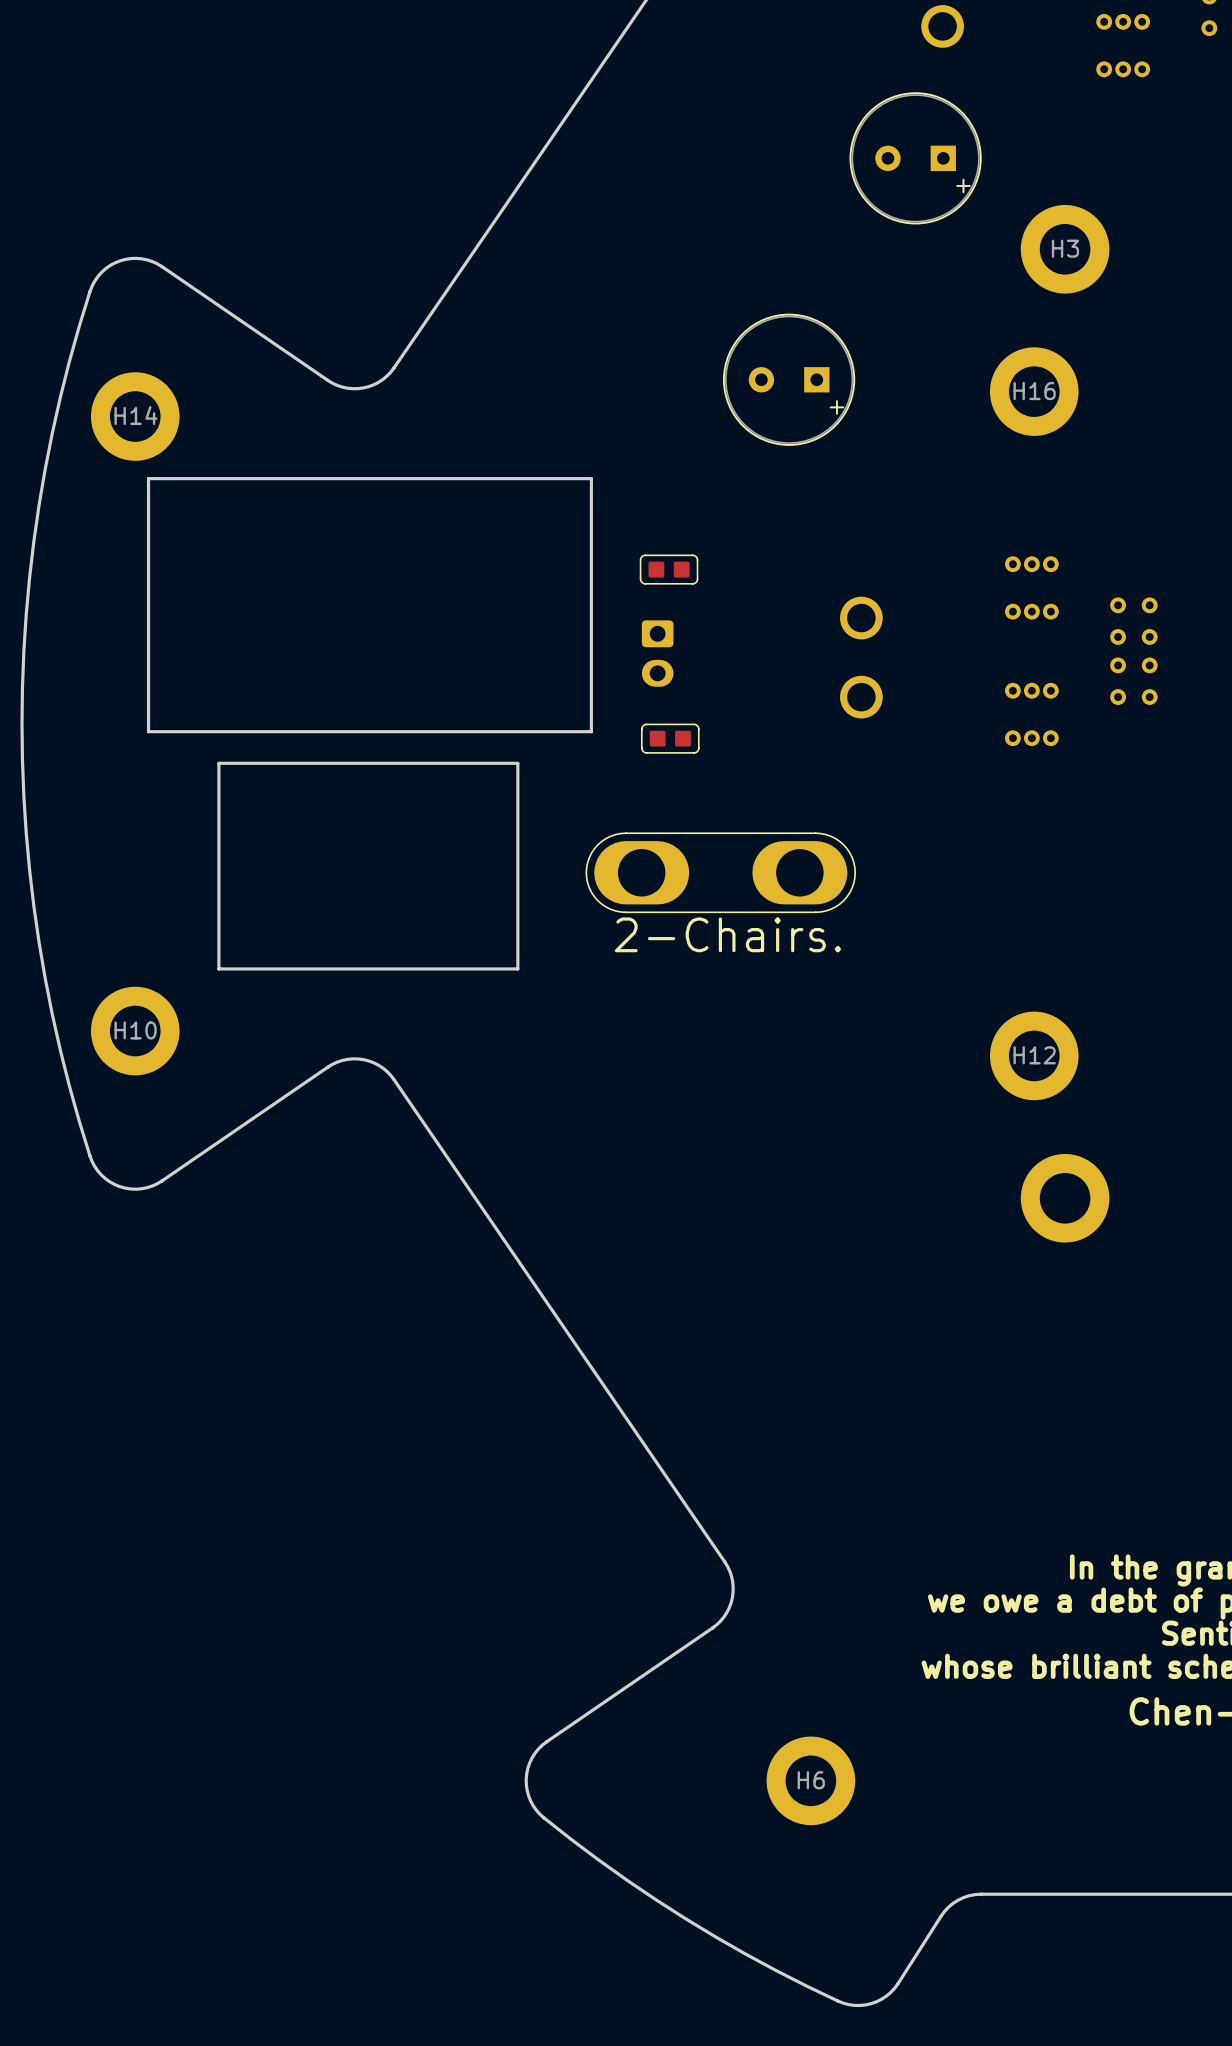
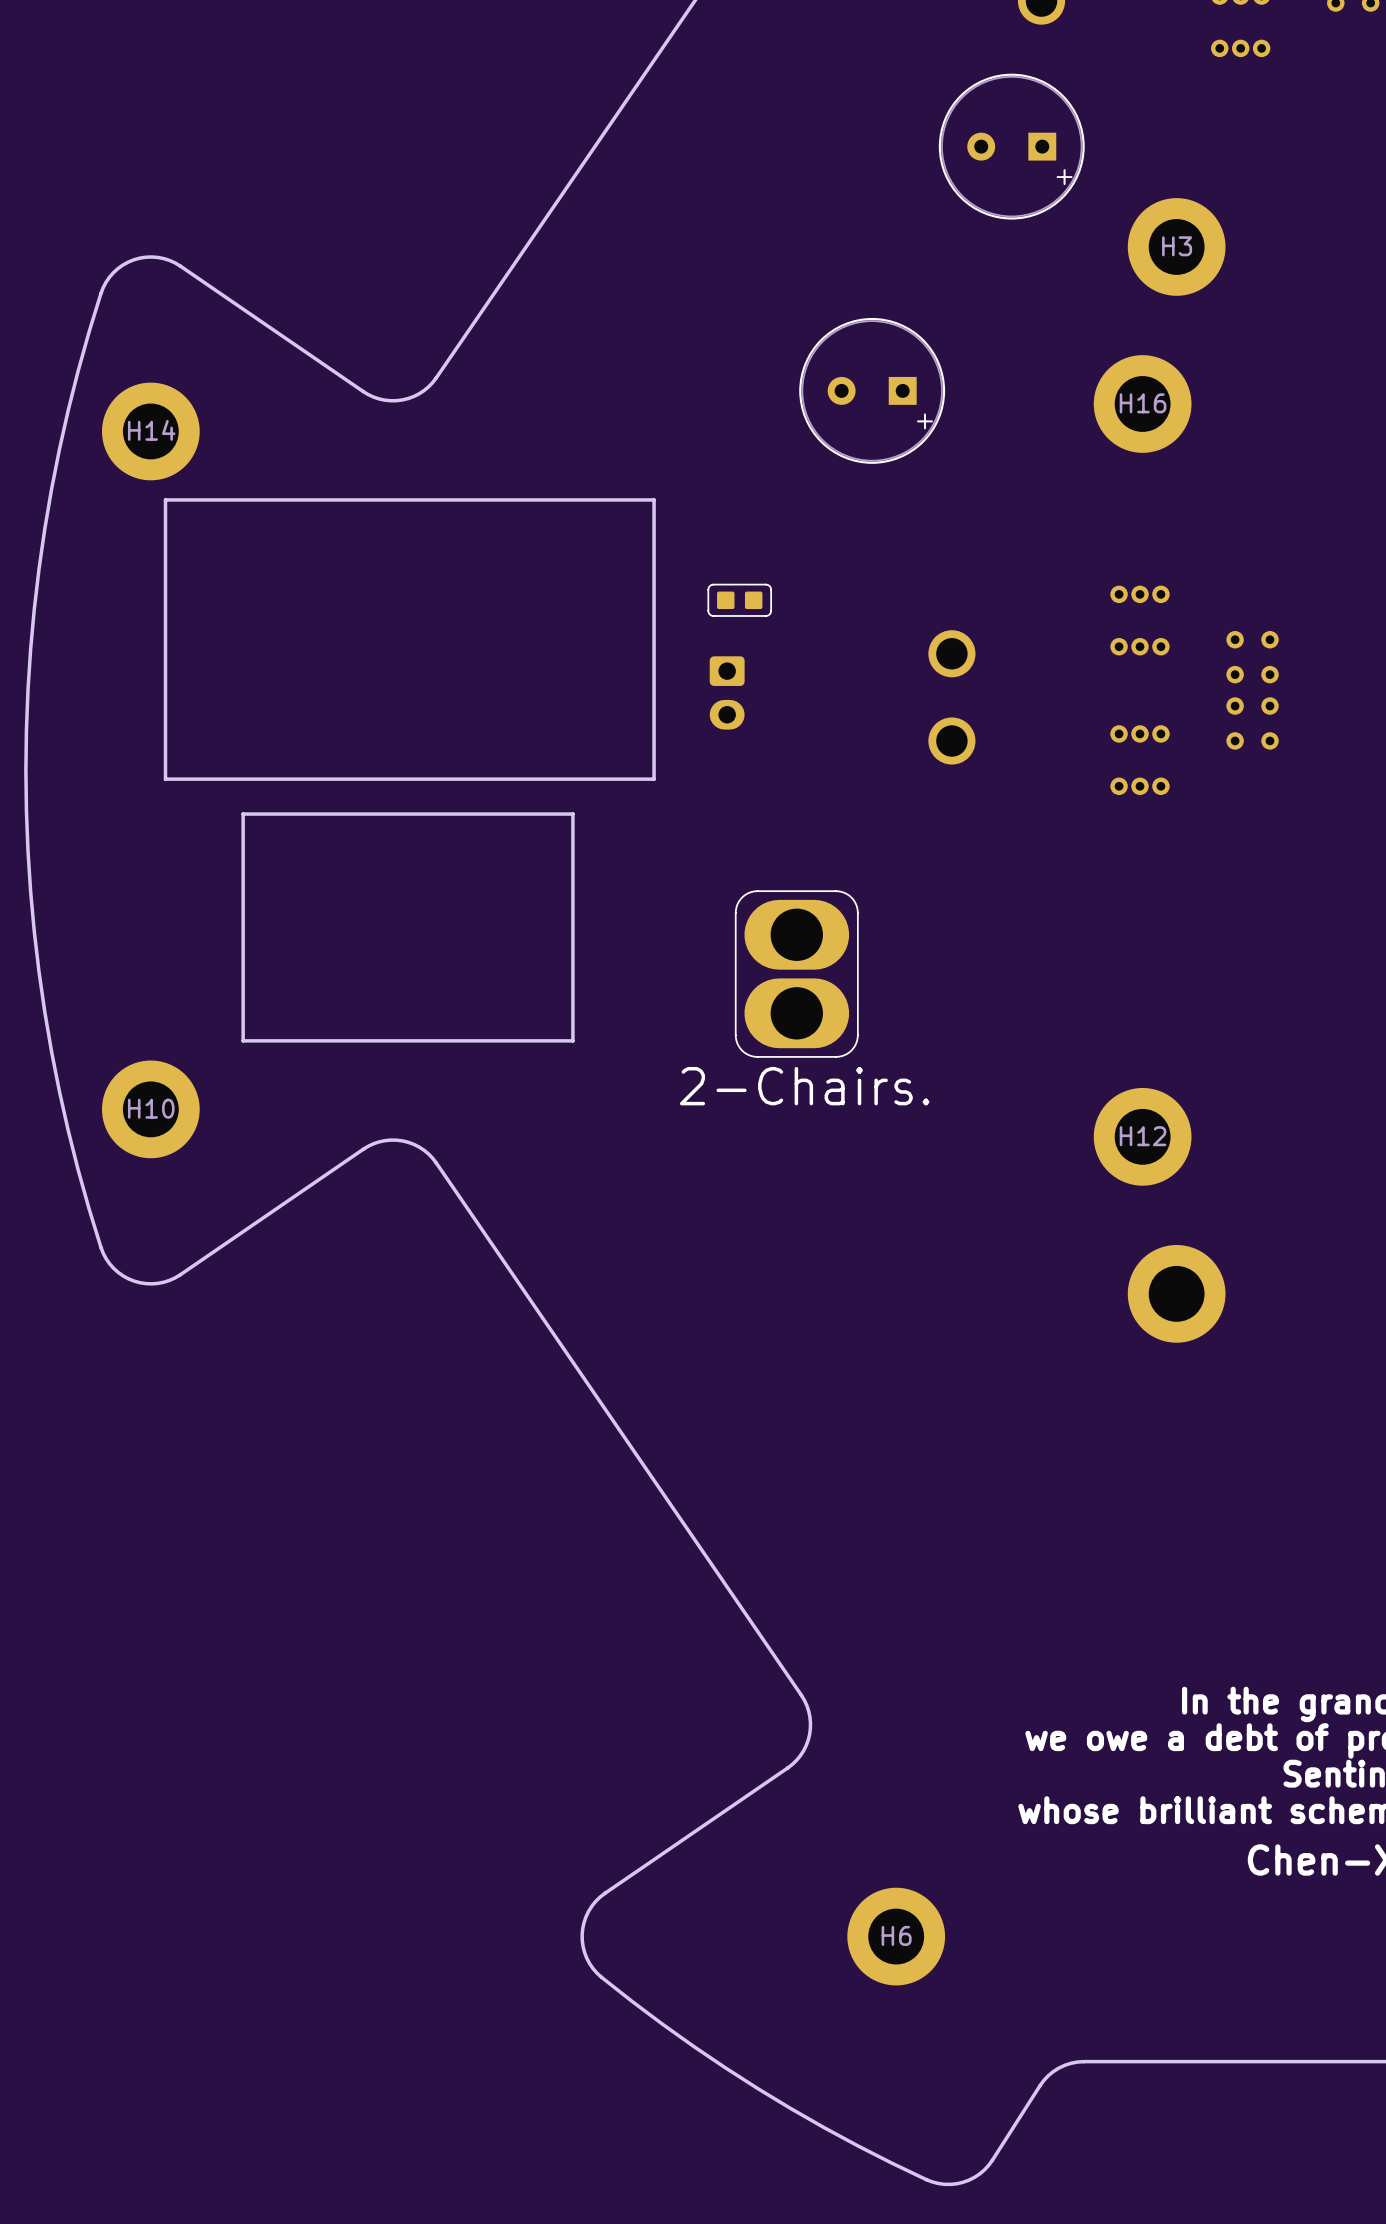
part: (670, 738) -> none
part: (720, 872) -> none
part: none -> (796, 974)

